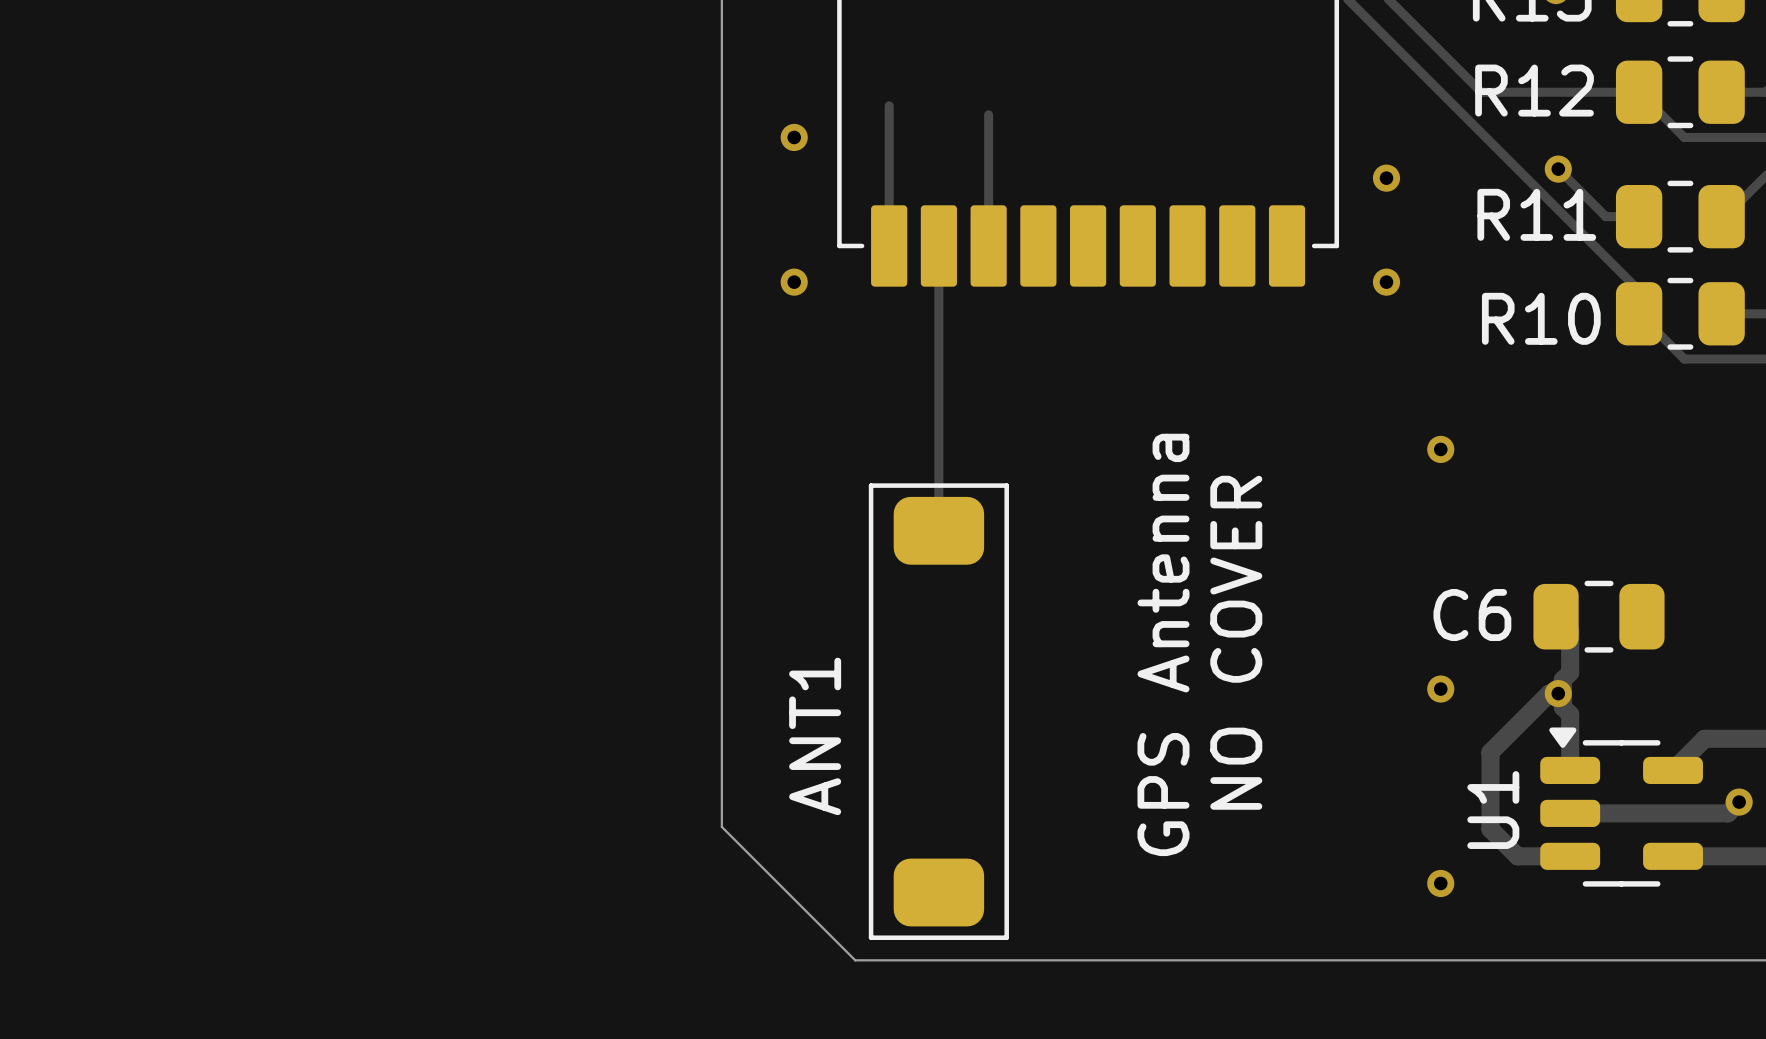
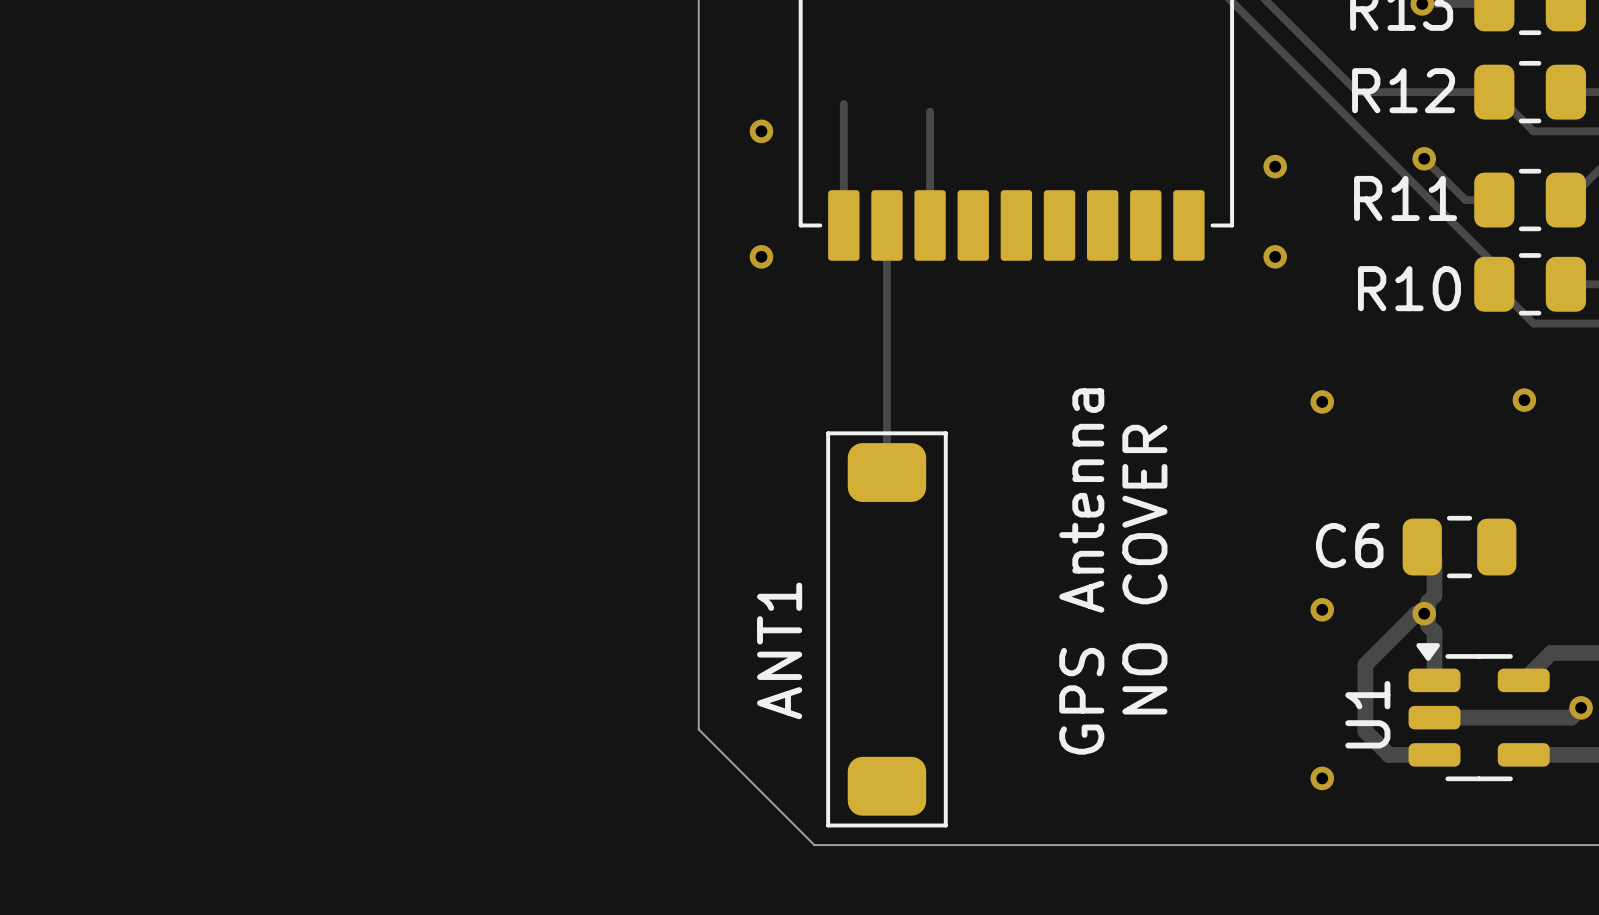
via: none -> (1524, 400)

